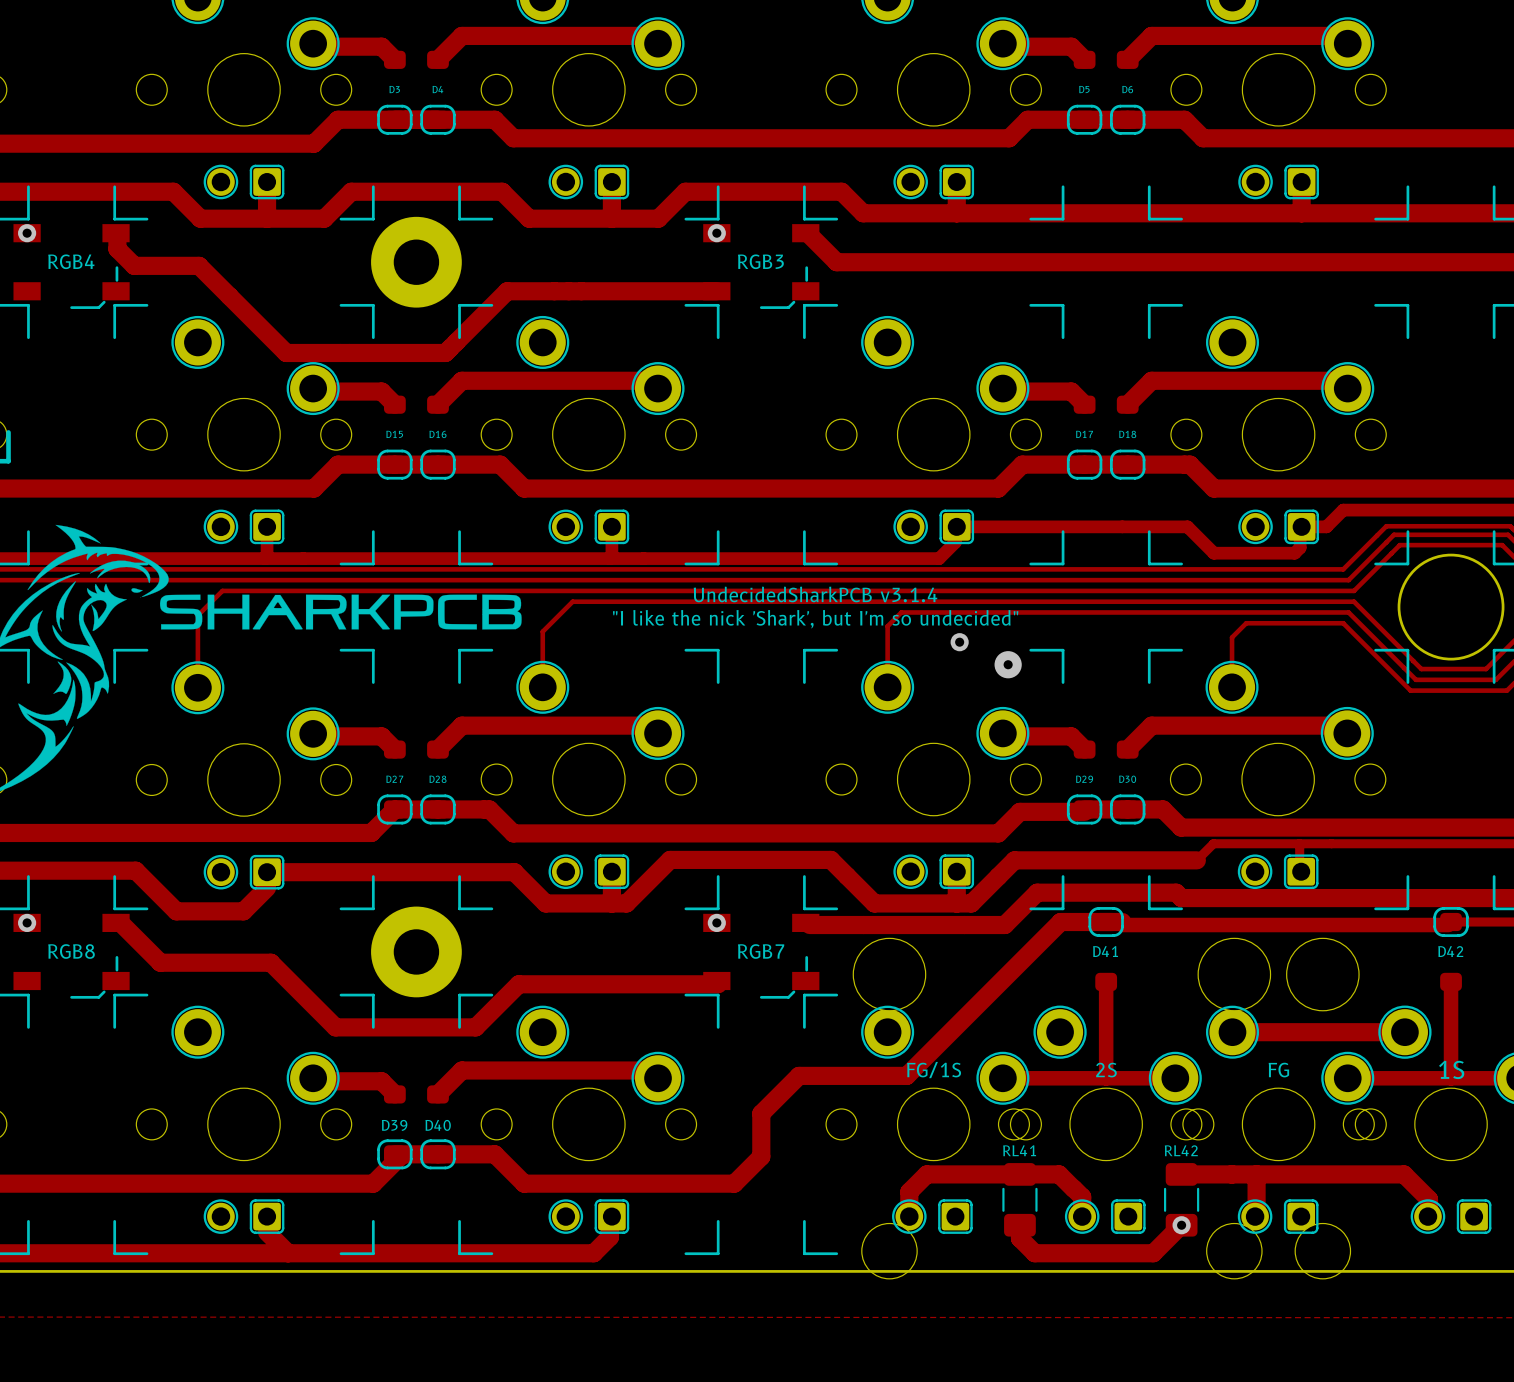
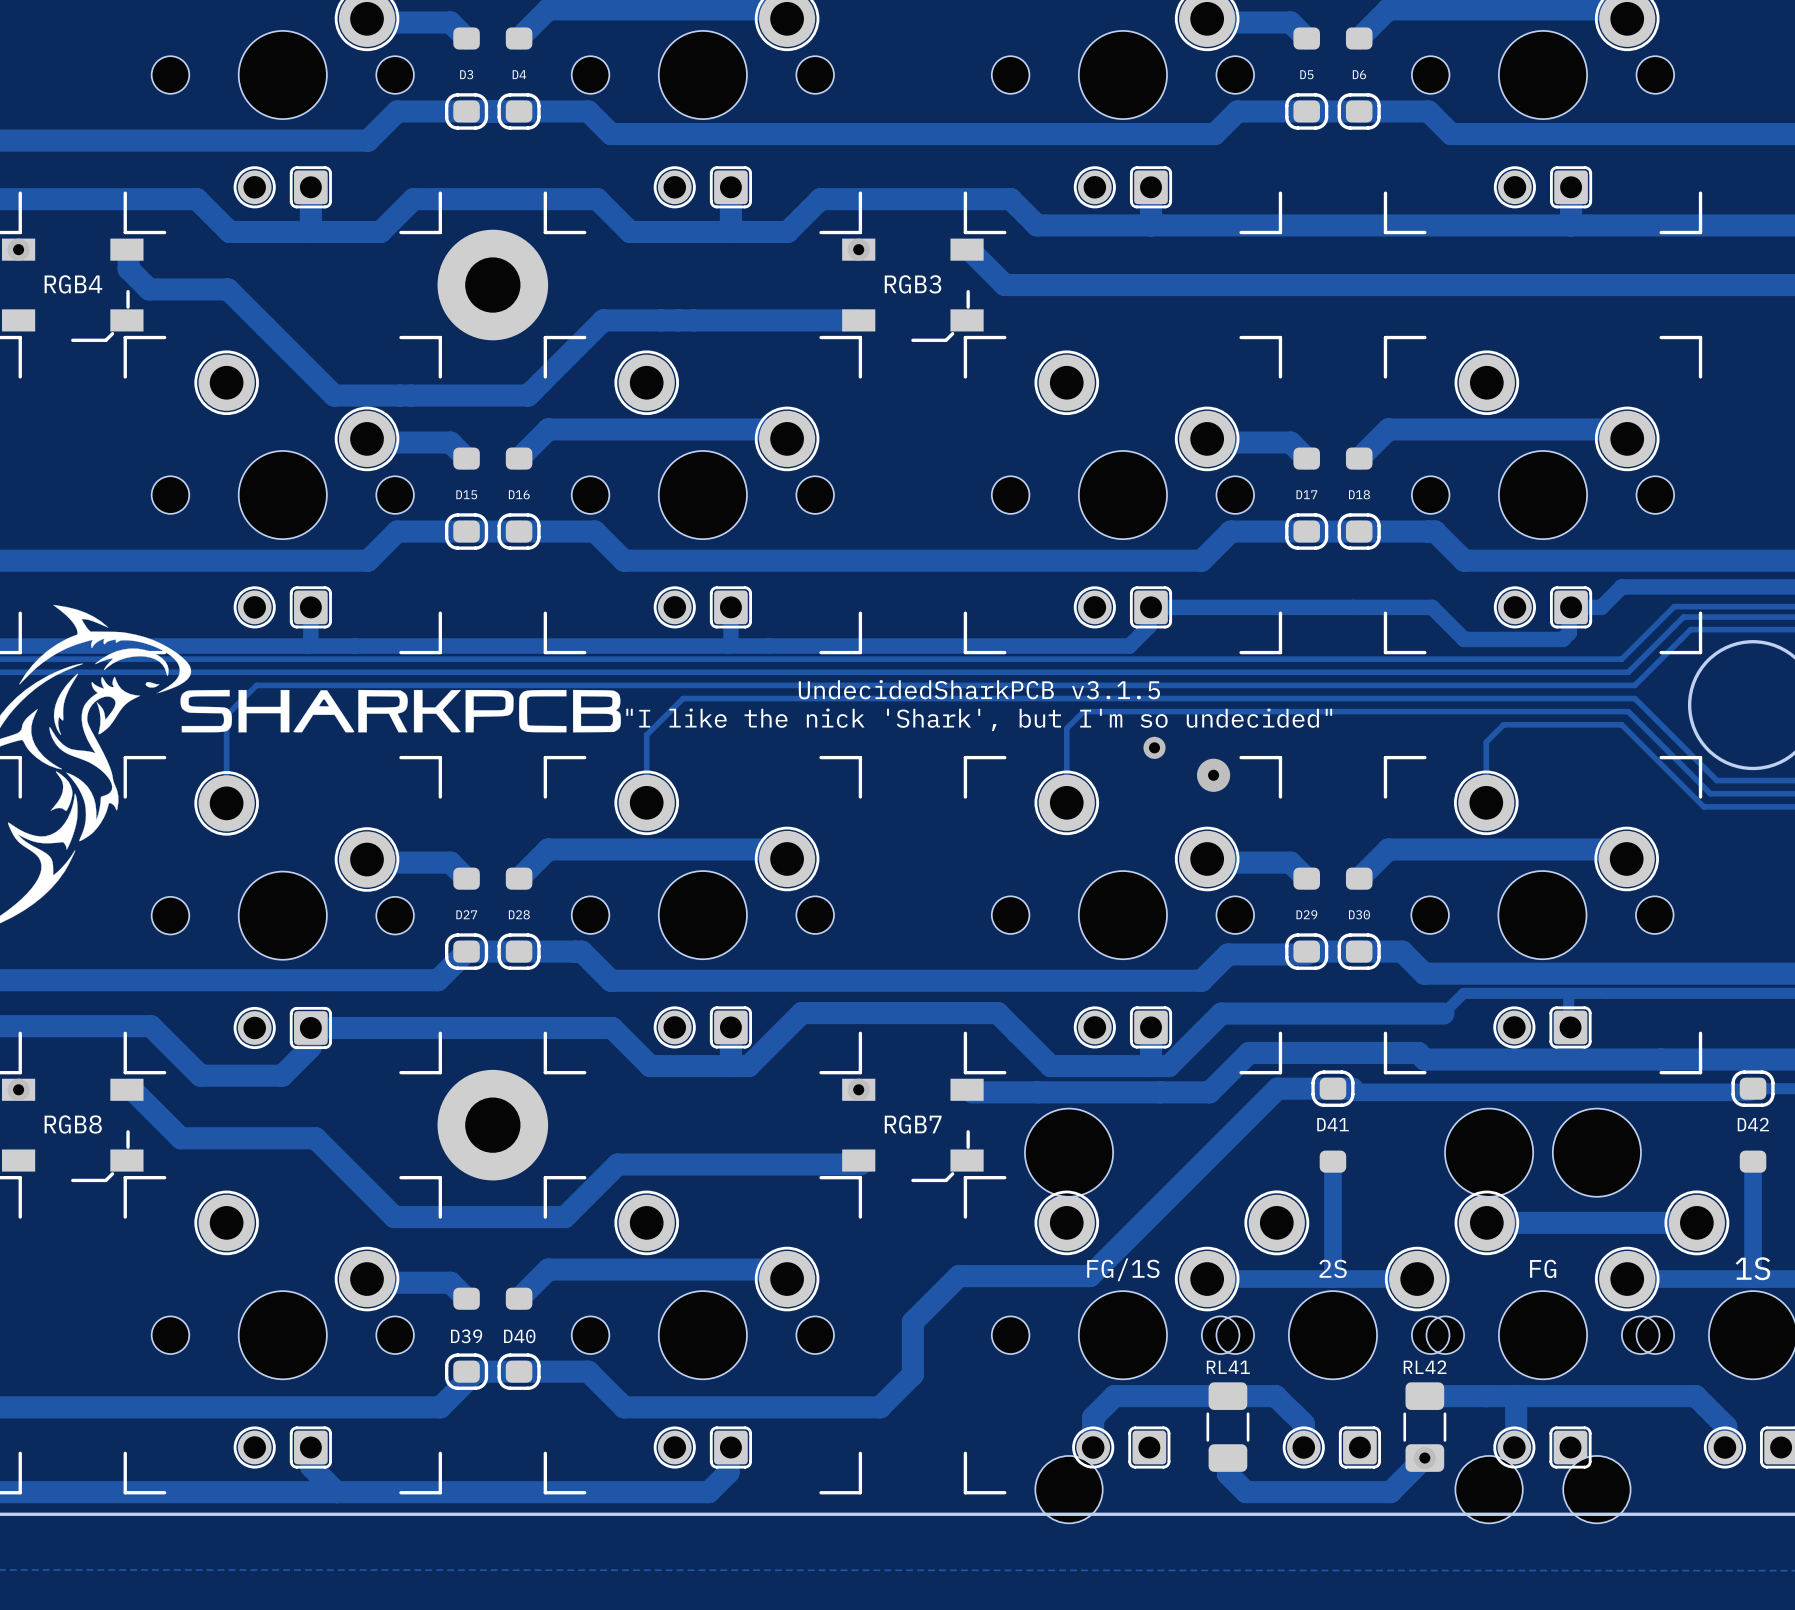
text: UndecidedSharkPCB v3.1.4 (815, 594) -> UndecidedSharkPCB v3.1.5 (979, 689)

